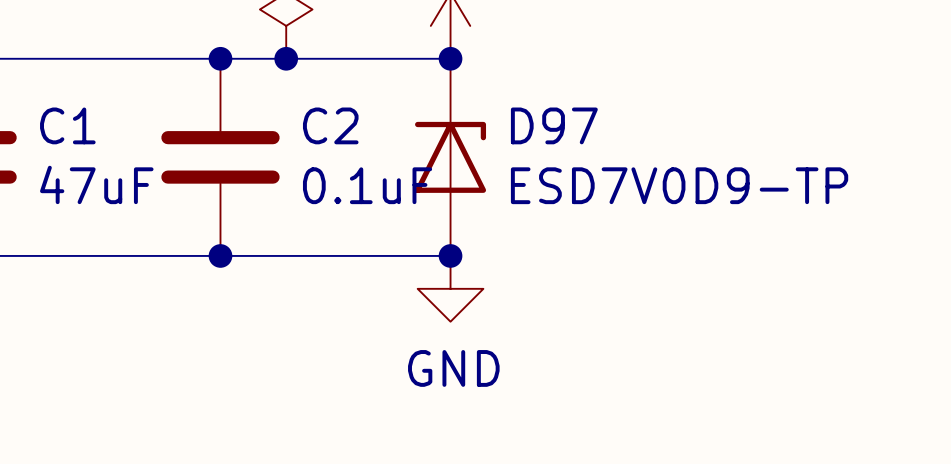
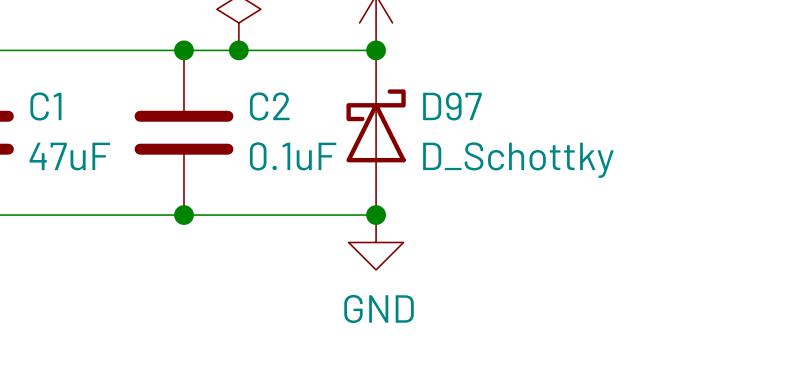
D97 symbol: [415, 58, 487, 256] -> [346, 50, 406, 216]
D97 value: ESD7V0D9-TP (679, 185) -> D_Schottky (518, 160)

